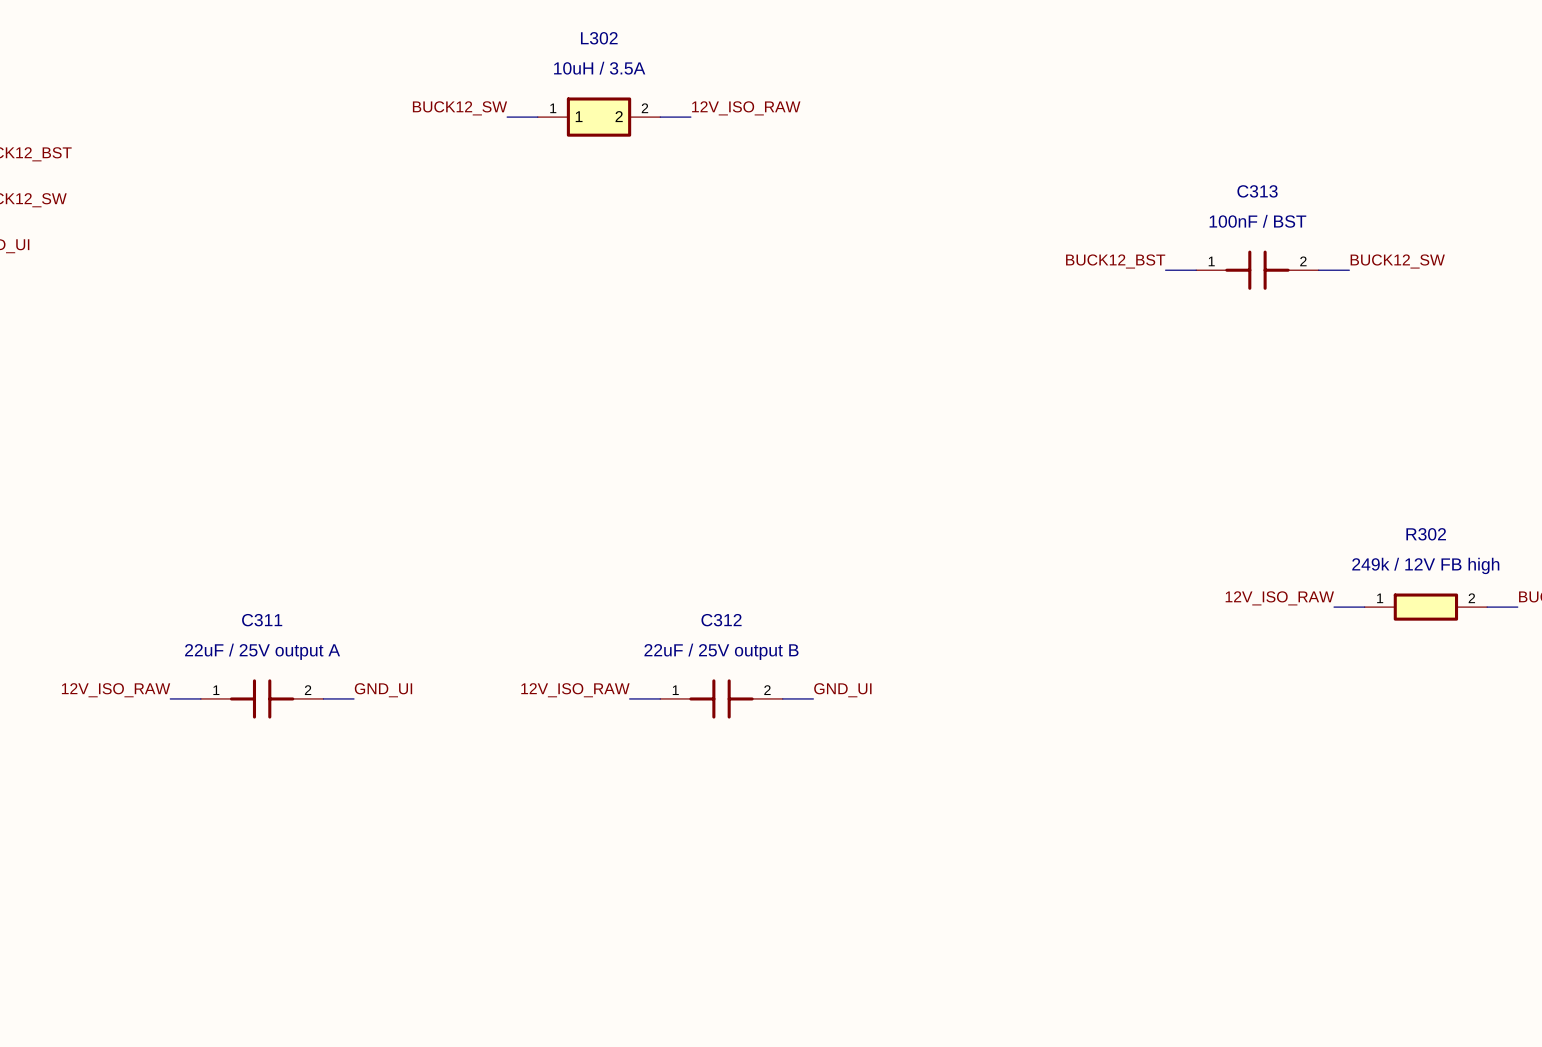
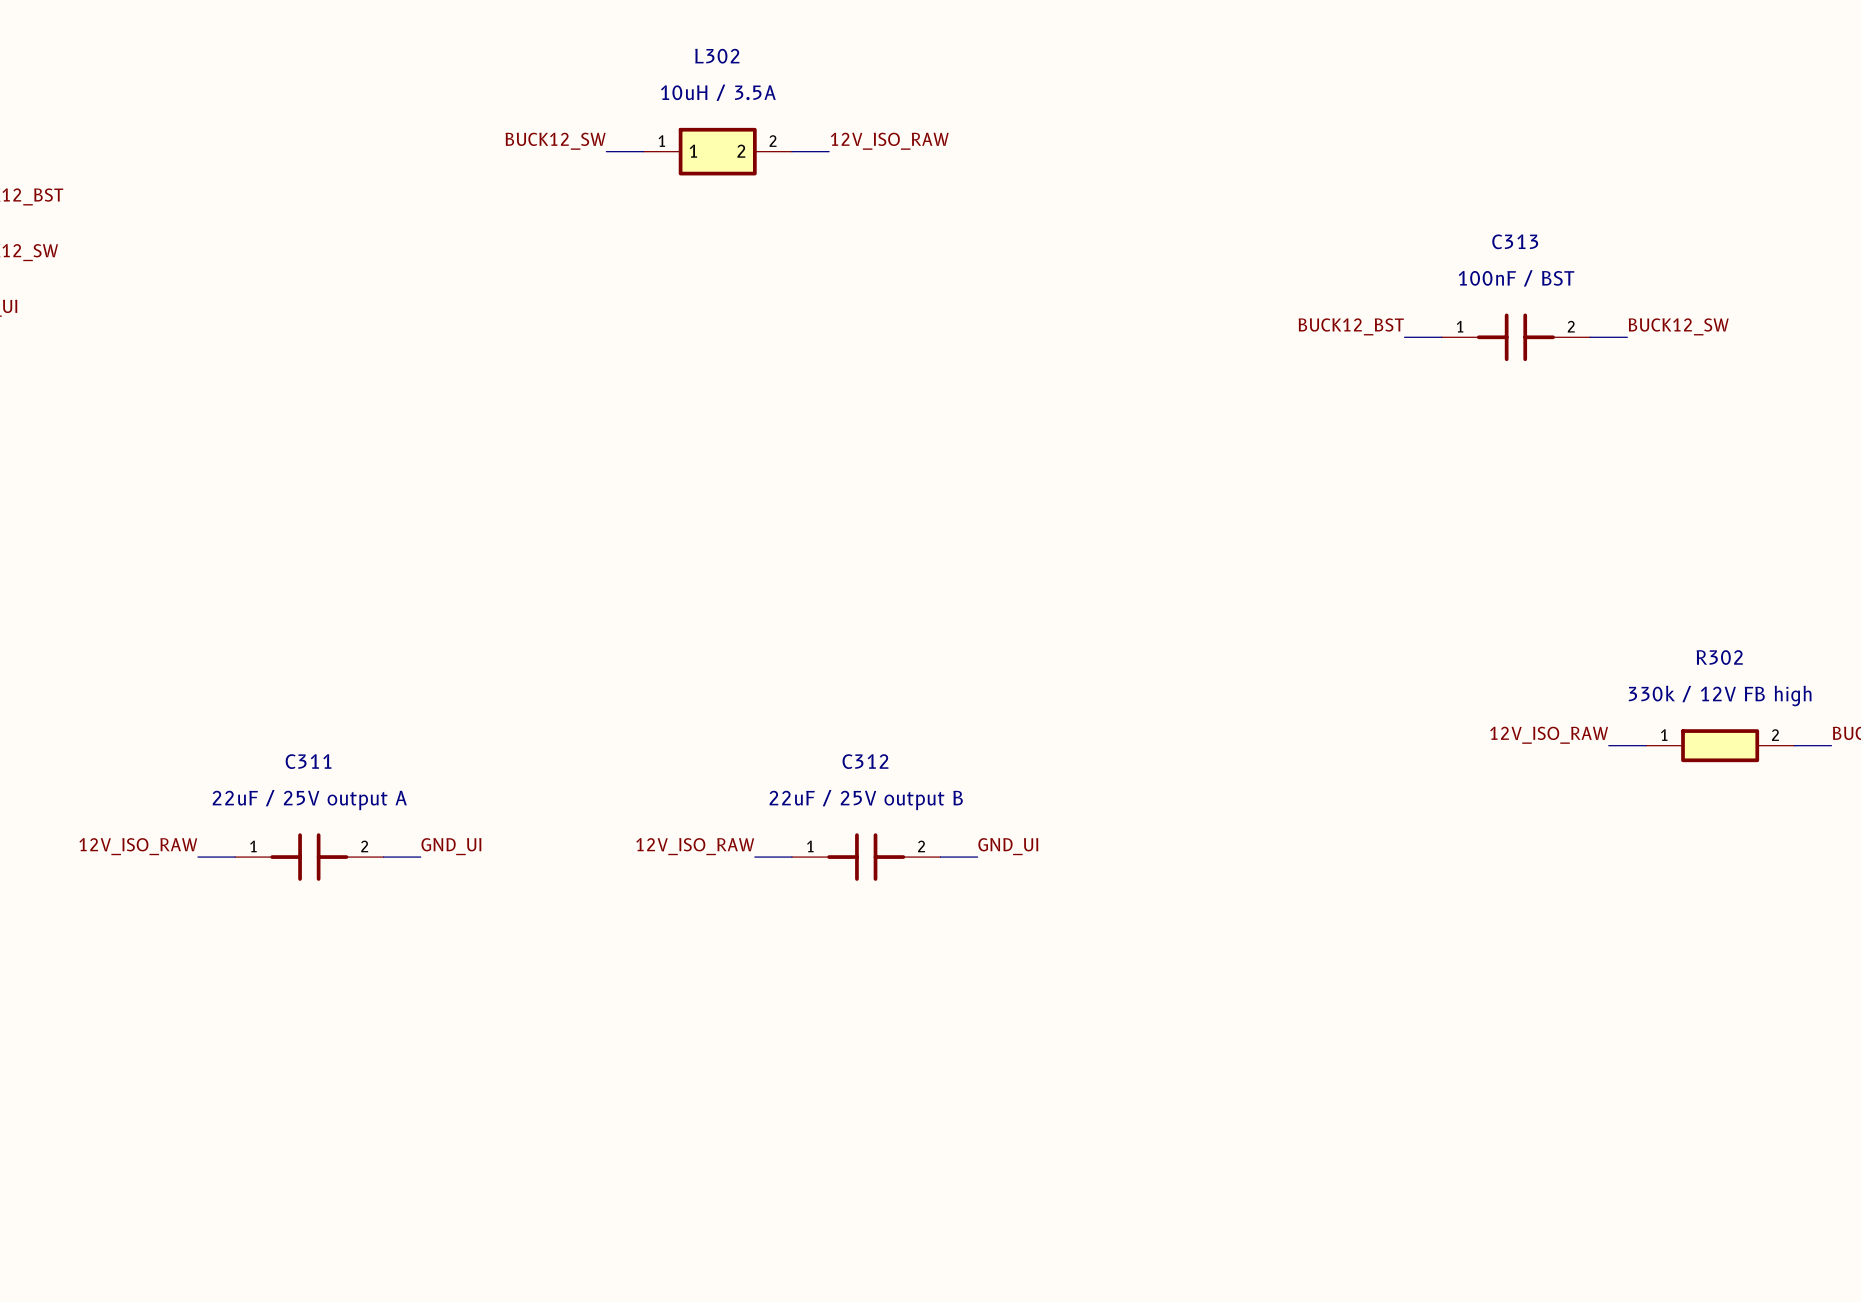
R302 value: 249k / 12V FB high (1425, 565) -> 330k / 12V FB high (1720, 695)

